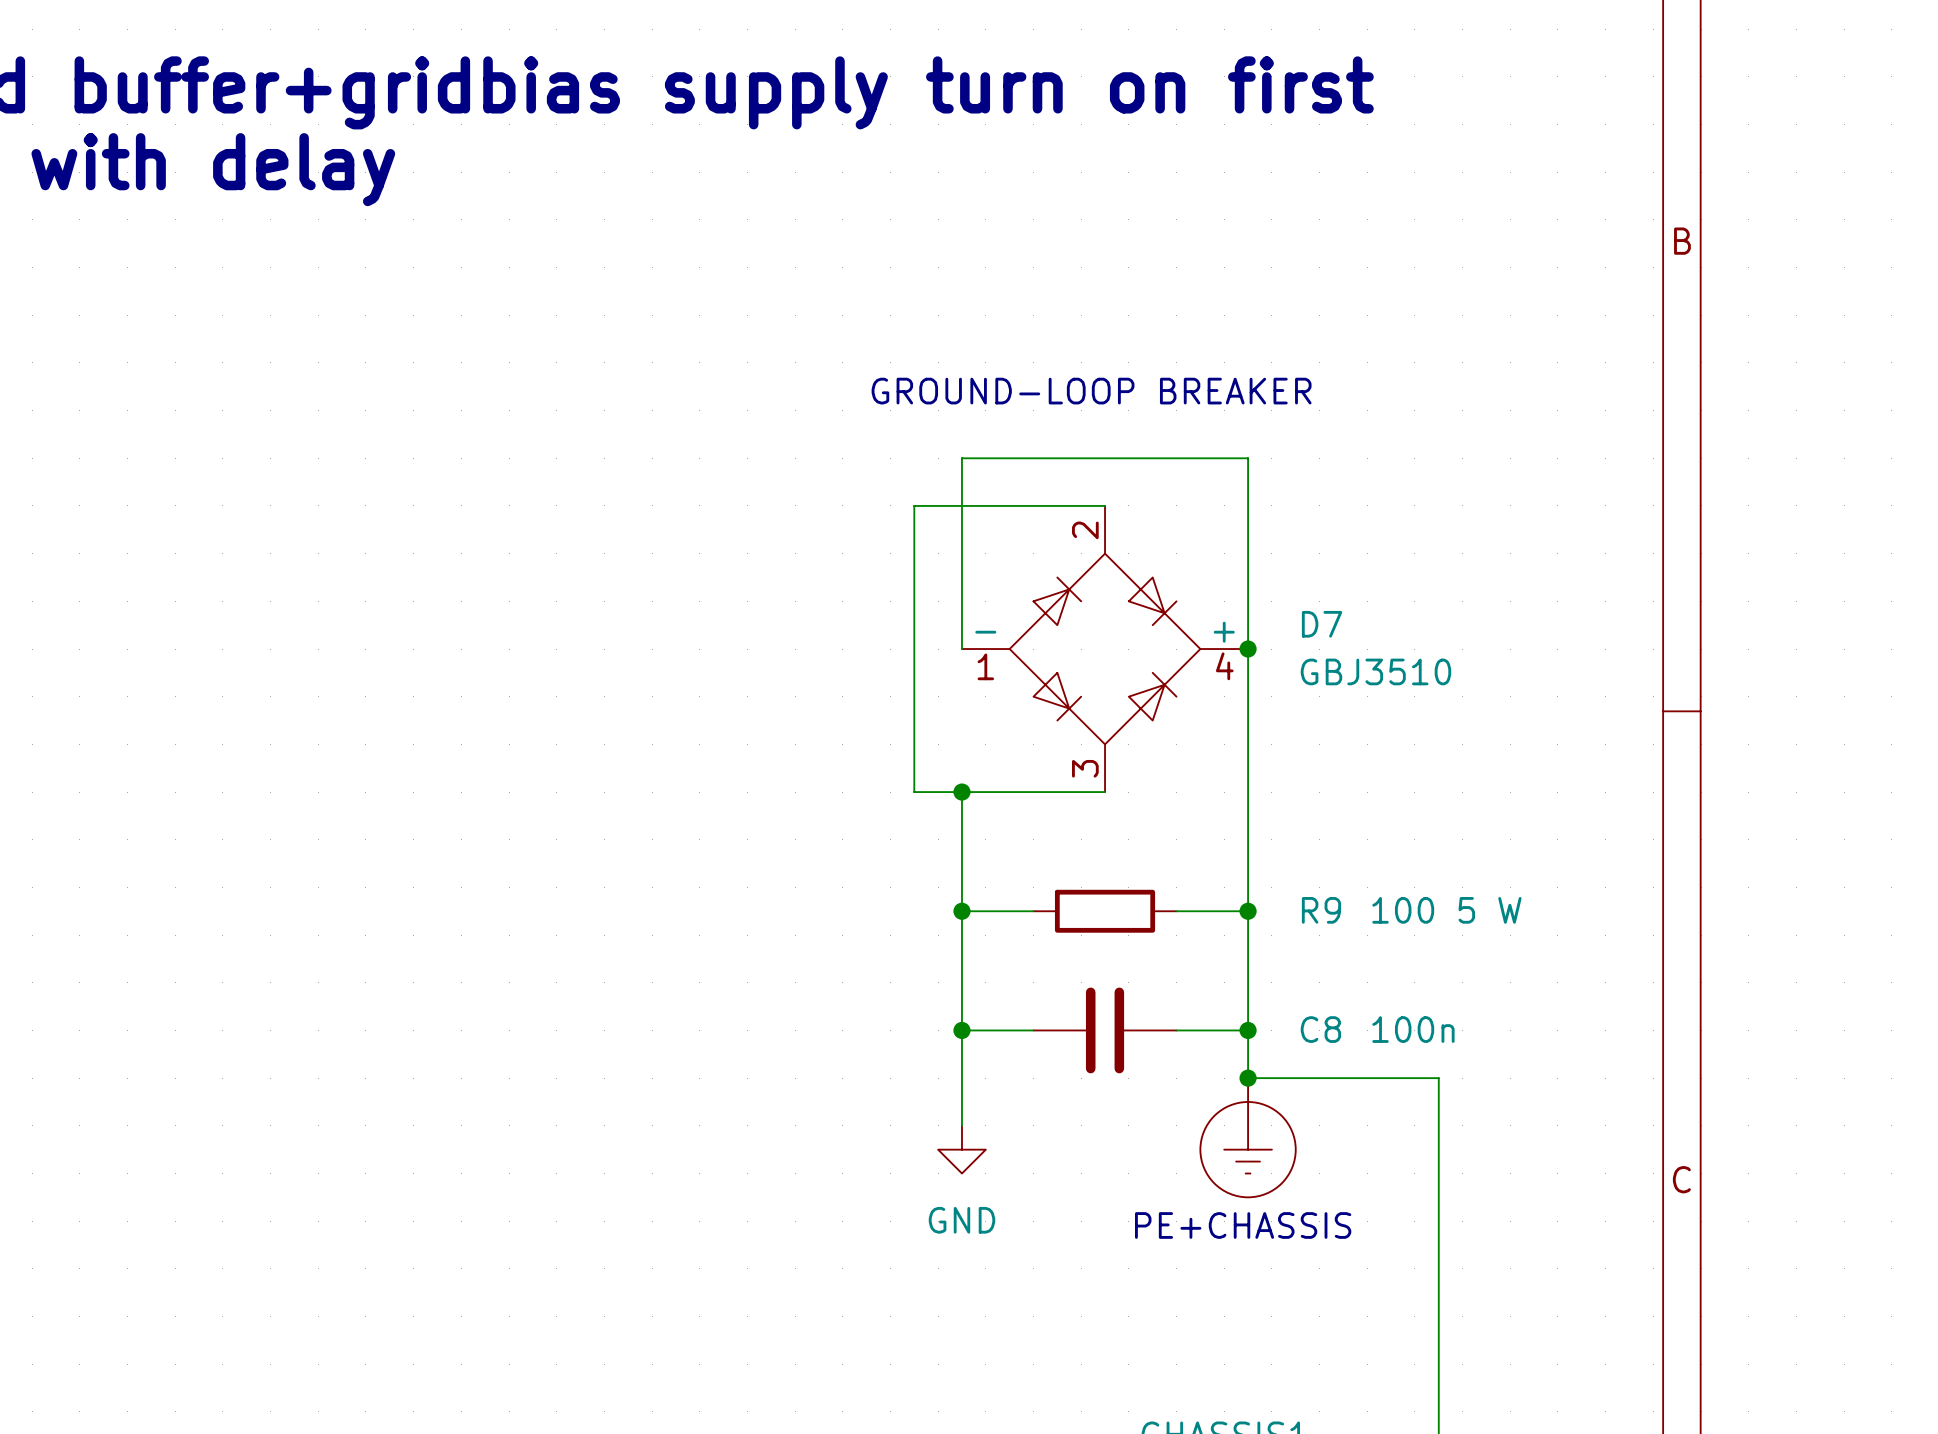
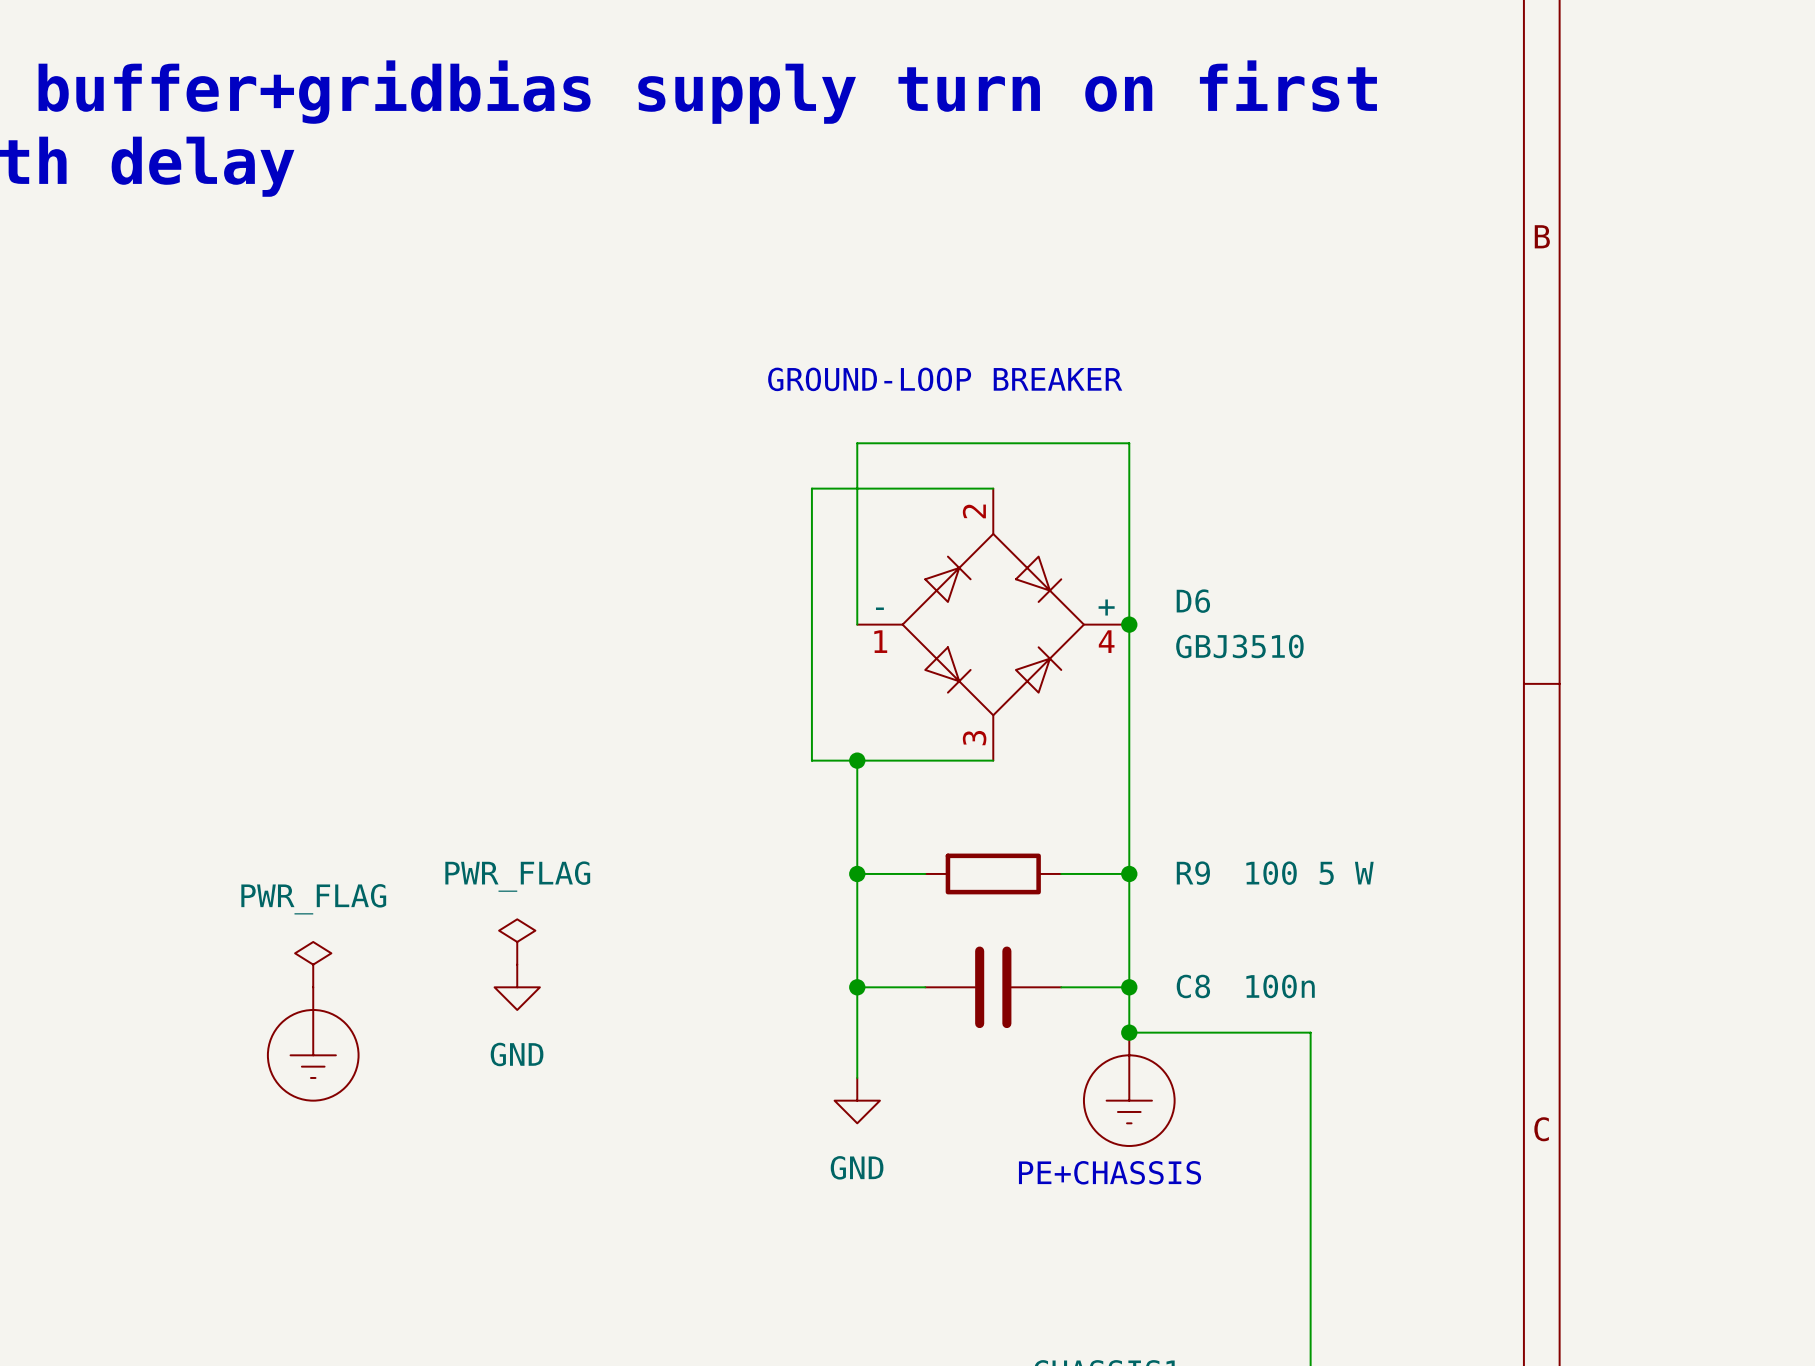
D7 name: D7 (1322, 624) -> D6 (1193, 601)
power symbol: none -> PWR_FLAG (517, 941)
power symbol: none -> PWR_FLAG (313, 964)
power symbol: none -> GND (517, 987)
power symbol: none -> (313, 1043)

